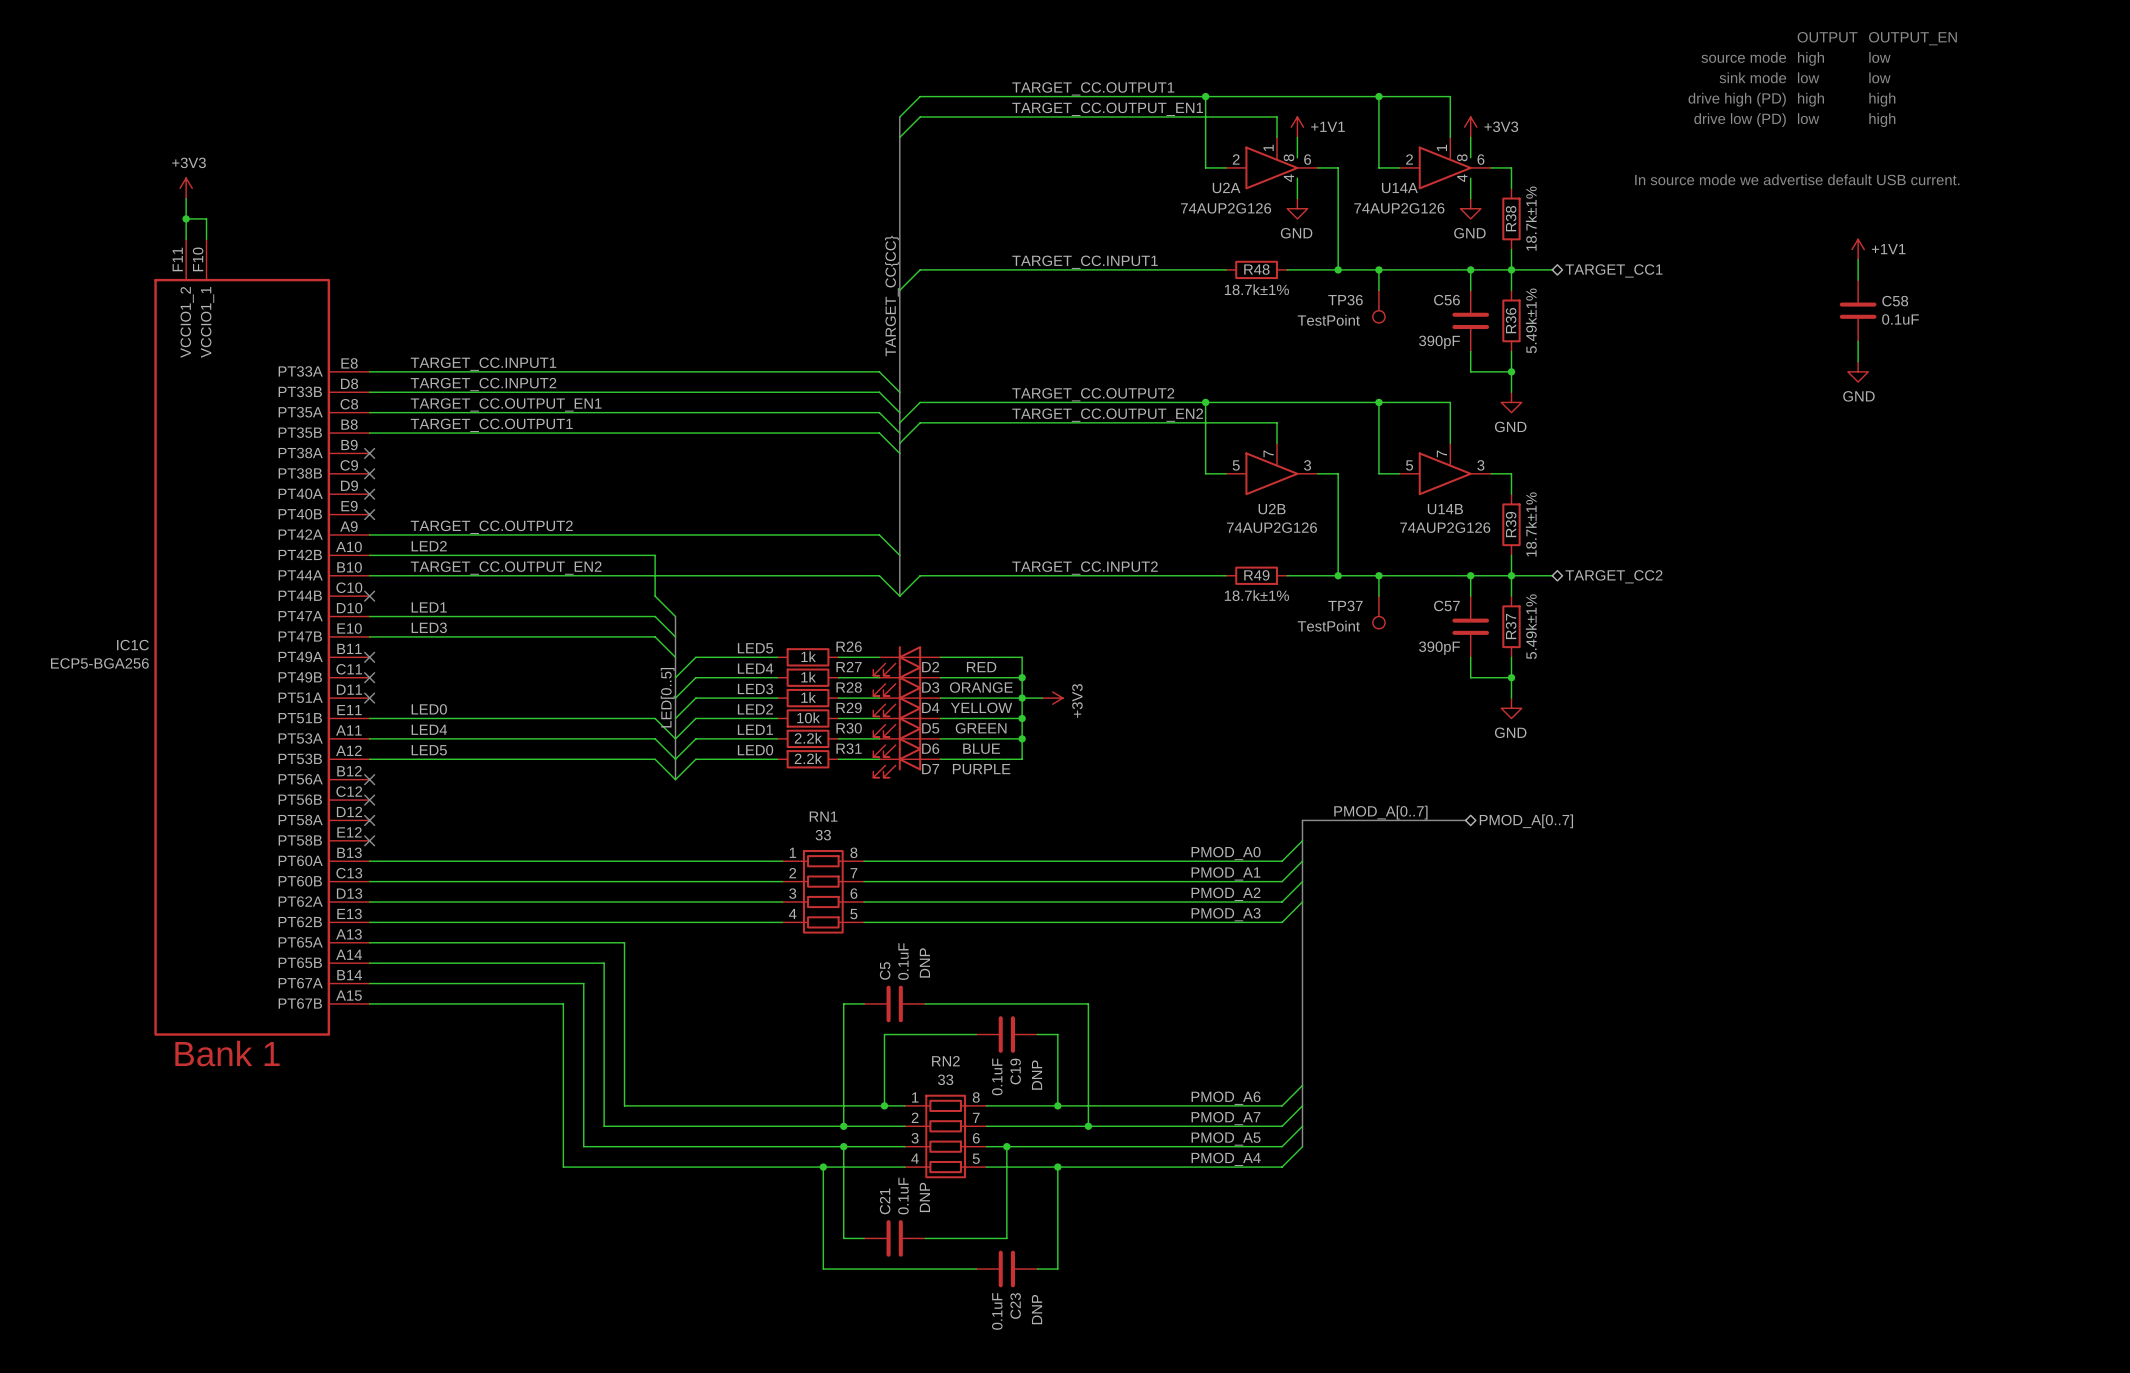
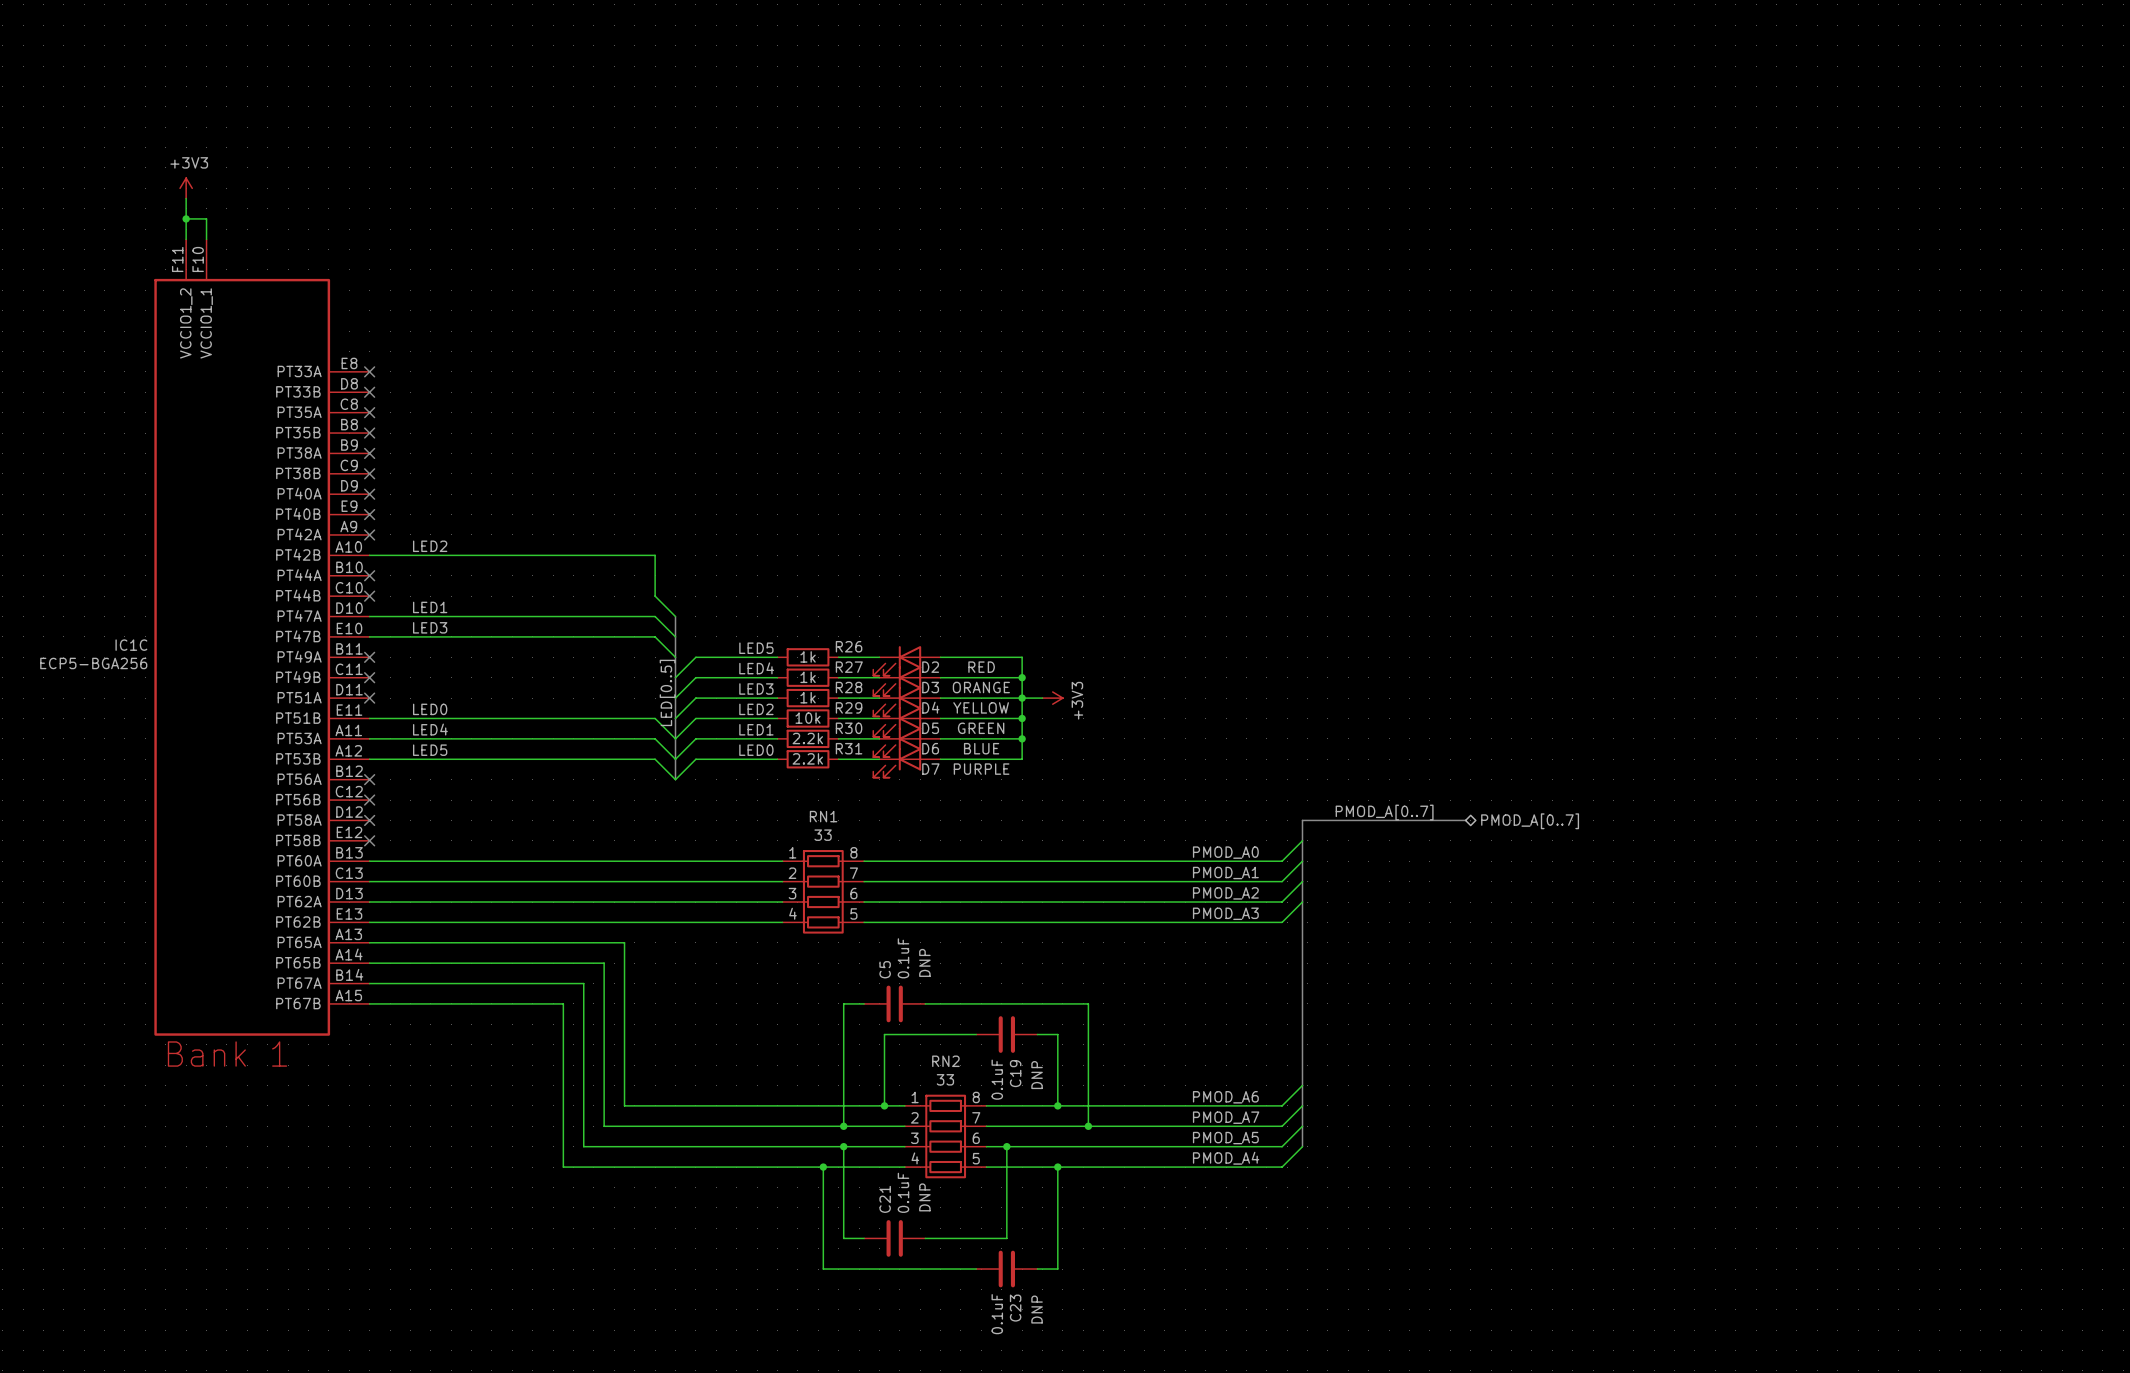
text: OUTPUT (1827, 37) -> none
text: OUTPUT_EN (1912, 38) -> none
text: source mode (1743, 57) -> none
text: low (1879, 57) -> none
text: high (1810, 58) -> none
text: sink mode (1752, 77) -> none
text: low (1808, 77) -> none
text: low (1879, 77) -> none
label: TARGET_CC.OUTPUT1 (1093, 88) -> none
wire: (1205, 96) (1205, 167) (1226, 167) -> none
junction: (1205, 96) -> none
wire: (1378, 96) (1378, 167) (1399, 167) -> none
junction: (1378, 96) -> none
text: drive high (PD) (1737, 99) -> none
text: high (1810, 99) -> none
text: high (1882, 99) -> none
label: TARGET_CC.OUTPUT_EN1 (1107, 109) -> none
wire: (899, 116) (920, 96) (1450, 96) (1450, 137) -> none
bus: (899, 116) (899, 596) -> none
text: low (1808, 118) -> none
text: drive low (PD) (1740, 120) -> none
text: high (1882, 120) -> none
power symbol: +1V1 (1297, 127) -> none
power symbol: +3V3 (1470, 127) -> none
wire: (899, 137) (920, 116) (1277, 116) (1277, 137) -> none
wire: (1297, 137) (1297, 157) -> none
wire: (1470, 137) (1470, 157) -> none
U2A: 74AUP2G126 (1271, 163) -> none
U14A: 74AUP2G126 (1445, 163) -> none
wire: (1317, 167) (1338, 167) (1338, 269) -> none
wire: (1491, 167) (1511, 167) (1511, 188) -> none
wire: (1297, 178) (1297, 198) -> none
wire: (1470, 178) (1470, 198) -> none
text: In source mode we advertise default USB current. (1797, 179) -> none
power symbol: GND (1297, 208) -> none
power symbol: GND (1470, 208) -> none
R38: 18.7k±1% (1511, 218) -> none
wire: (1511, 249) (1511, 290) -> none
power symbol: +1V1 (1858, 249) -> none
wire: (1858, 259) (1858, 280) -> none
label: TARGET_CC.INPUT1 (1085, 262) -> none
wire: (1226, 269) (920, 269) (899, 290) -> none
R48: 18.7k±1% (1256, 269) -> none
wire: (1287, 269) (1552, 269) -> none
junction: (1338, 269) -> none
wire: (1378, 269) (1378, 290) -> none
junction: (1378, 269) -> none
wire: (1470, 269) (1470, 290) -> none
junction: (1470, 269) -> none
junction: (1511, 269) -> none
hierarchical label: TARGET_CC1 (1614, 270) -> none
label: TARGET_CC{CC} (891, 296) -> none
TP36: TestPoint (1378, 306) -> none
C58: 0.1uF (1858, 310) -> none
C56: 390pF (1470, 320) -> none
R36: 5.49k±1% (1511, 320) -> none
wire: (1858, 341) (1858, 361) -> none
wire: (1470, 351) (1470, 371) (1511, 371) -> none
wire: (1511, 351) (1511, 392) -> none
label: TARGET_CC.INPUT1 (483, 364) -> none
wire: (369, 371) (879, 371) (899, 392) -> none
no-connect mark: none -> (369, 371)
junction: (1511, 371) -> none
power symbol: GND (1858, 371) -> none
label: TARGET_CC.INPUT2 (483, 384) -> none
wire: (369, 392) (879, 392) (899, 412) -> none
no-connect mark: none -> (369, 392)
label: TARGET_CC.OUTPUT2 (1093, 394) -> none
wire: (1205, 402) (1205, 473) (1226, 473) -> none
junction: (1205, 402) -> none
wire: (1378, 402) (1378, 473) (1399, 473) -> none
junction: (1378, 402) -> none
power symbol: GND (1511, 402) -> none
label: TARGET_CC.OUTPUT_EN1 (506, 404) -> none
wire: (369, 412) (879, 412) (899, 433) -> none
no-connect mark: none -> (369, 412)
label: TARGET_CC.OUTPUT_EN2 (1107, 415) -> none
wire: (899, 422) (920, 402) (1450, 402) (1450, 443) -> none
label: TARGET_CC.OUTPUT1 (491, 425) -> none
wire: (369, 433) (879, 433) (899, 453) -> none
no-connect mark: none -> (369, 433)
wire: (899, 443) (920, 422) (1277, 422) (1277, 443) -> none
U2B: 74AUP2G126 (1271, 469) -> none
U14B: 74AUP2G126 (1445, 469) -> none
wire: (1317, 473) (1338, 473) (1338, 575) -> none
wire: (1491, 473) (1511, 473) (1511, 494) -> none
R39: 18.7k±1% (1511, 524) -> none
label: TARGET_CC.OUTPUT2 (491, 527) -> none
wire: (369, 534) (879, 534) (899, 555) -> none
no-connect mark: none -> (369, 534)
wire: (1511, 555) (1511, 596) -> none
label: TARGET_CC.OUTPUT_EN2 (506, 568) -> none
label: TARGET_CC.INPUT2 (1085, 568) -> none
wire: (369, 575) (879, 575) (899, 596) (920, 575) (1226, 575) -> none
no-connect mark: none -> (369, 575)
R49: 18.7k±1% (1256, 575) -> none
wire: (1287, 575) (1552, 575) -> none
junction: (1338, 575) -> none
wire: (1378, 575) (1378, 596) -> none
junction: (1378, 575) -> none
wire: (1470, 575) (1470, 596) -> none
junction: (1470, 575) -> none
junction: (1511, 575) -> none
hierarchical label: TARGET_CC2 (1614, 576) -> none
TP37: TestPoint (1378, 612) -> none
C57: 390pF (1470, 626) -> none
R37: 5.49k±1% (1511, 626) -> none
wire: (1470, 657) (1470, 677) (1511, 677) -> none
wire: (1511, 657) (1511, 698) -> none
junction: (1511, 677) -> none
power symbol: GND (1511, 708) -> none

